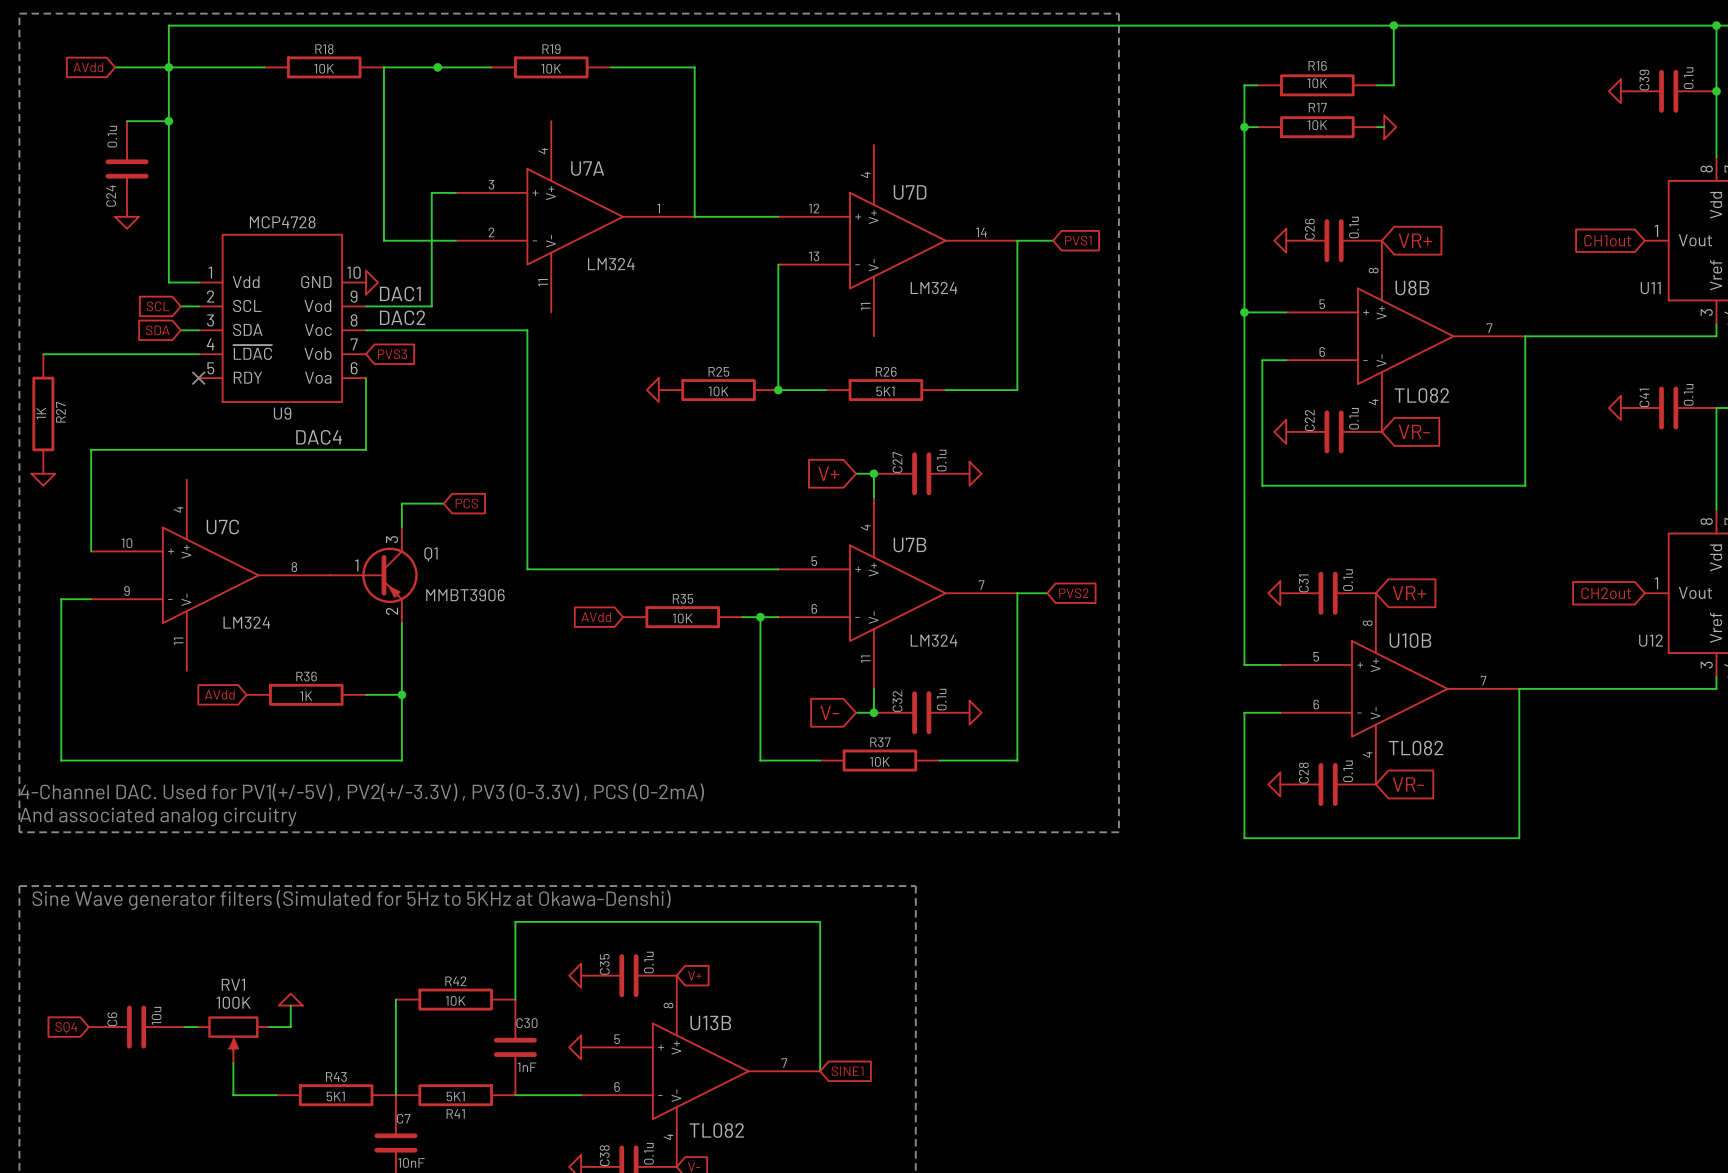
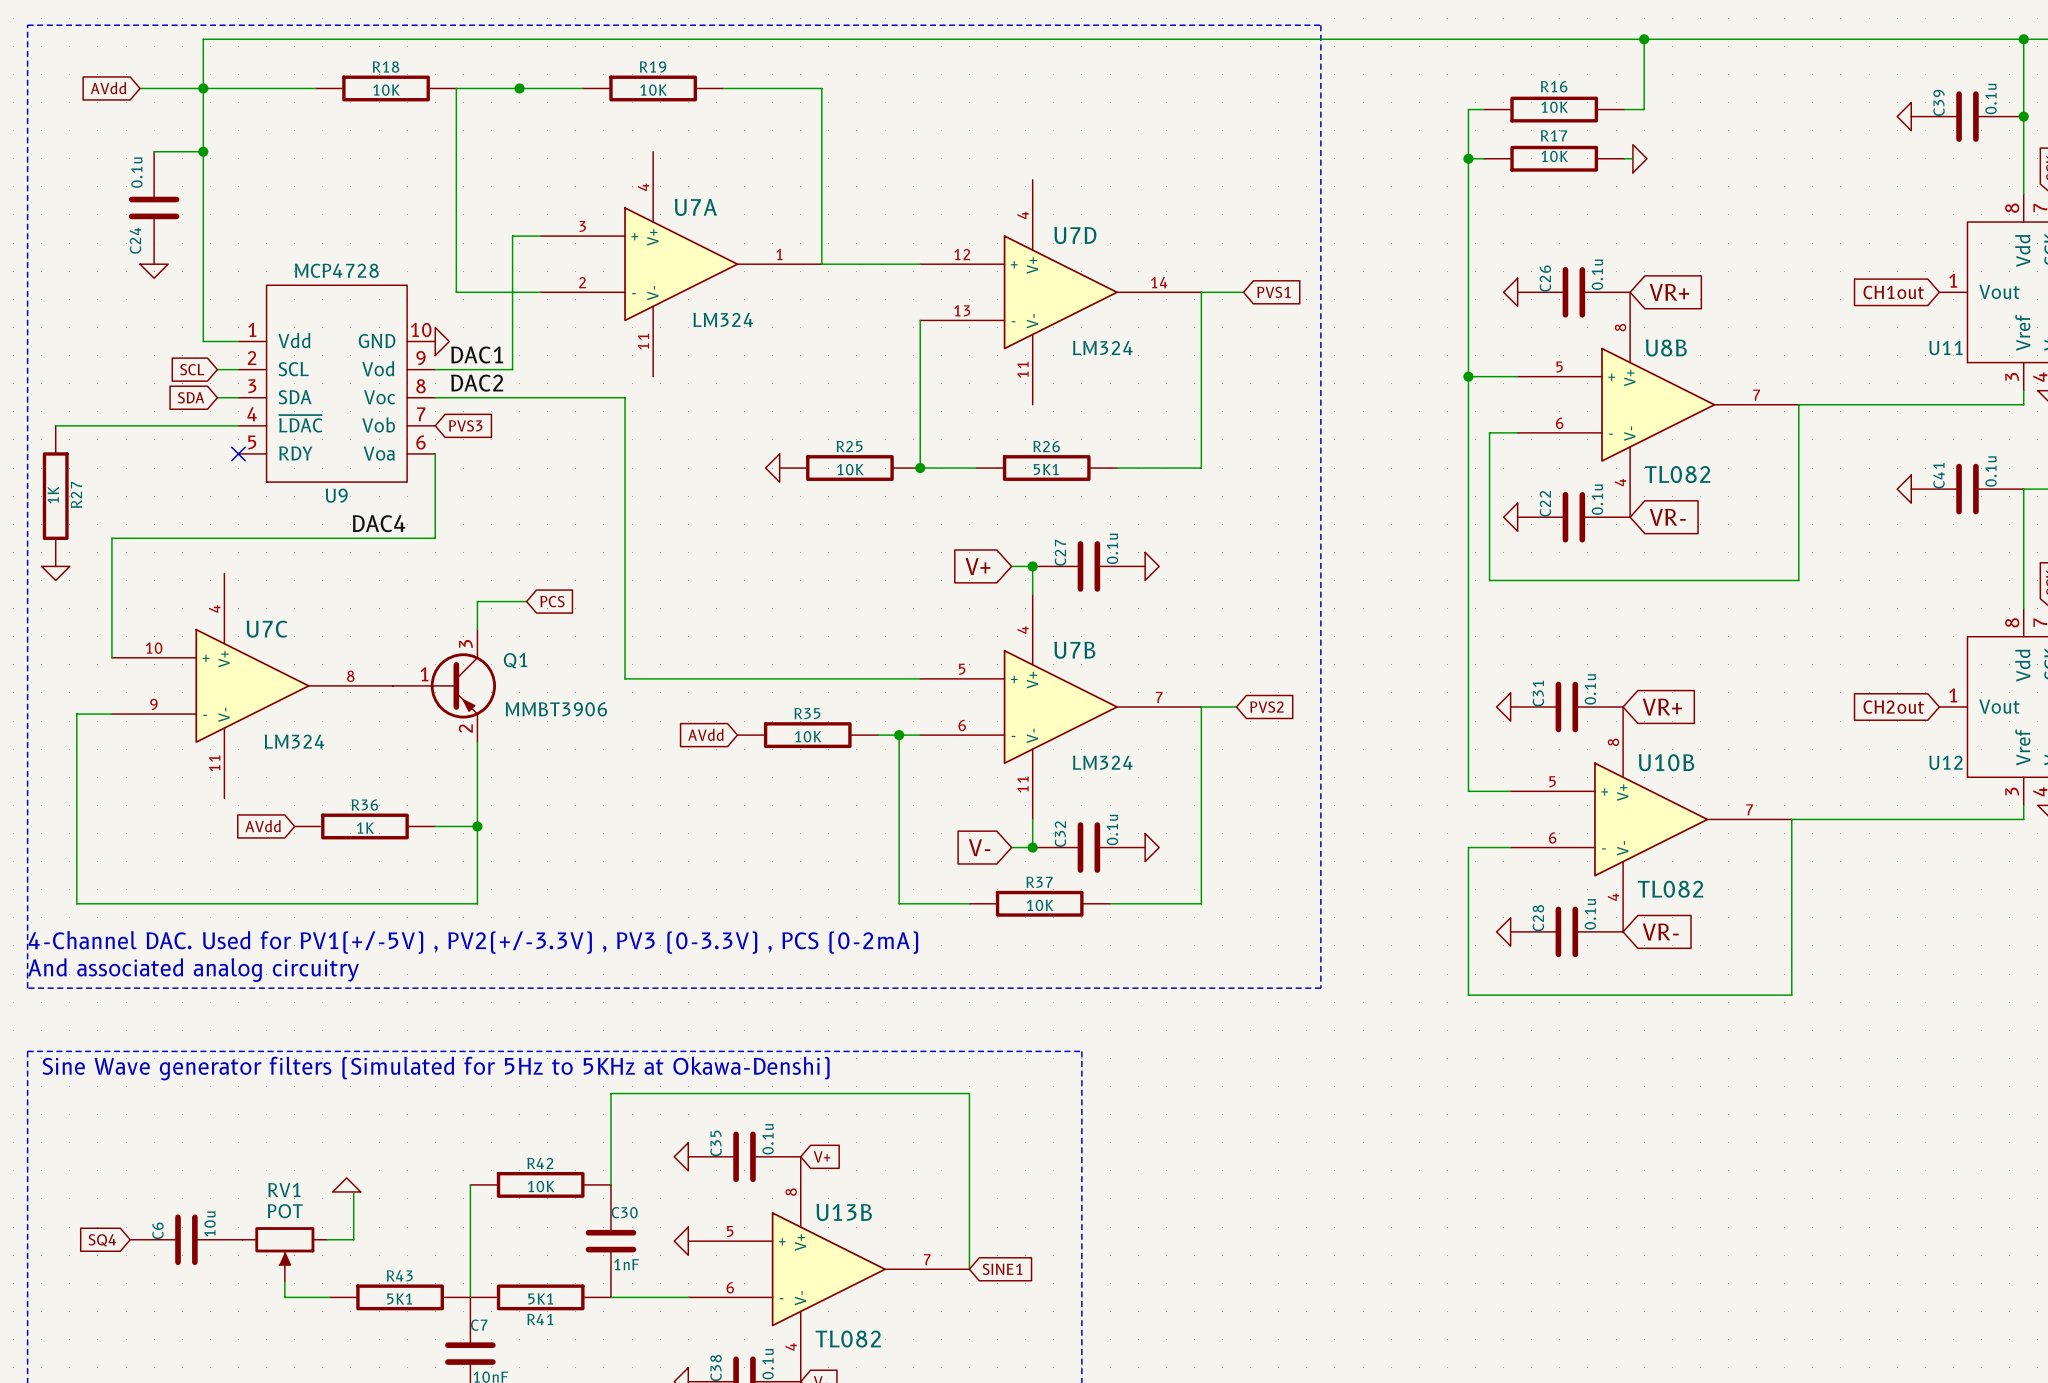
RV1 value: 100K (233, 1002) -> POT (285, 1211)
wire: (290, 1005) (290, 1027) (269, 1027) -> none
wire: none -> (353, 1193) (353, 1239) (327, 1239)
global label position: SQ4 (66, 1027) -> SQ4 (102, 1240)
C6 position: (136, 1027) -> (186, 1239)
wire: (184, 1027) (197, 1027) -> none
RV1 position: (233, 1039) -> (284, 1254)
wire: (233, 1062) (233, 1095) (238, 1095) -> (284, 1281) (284, 1297)

